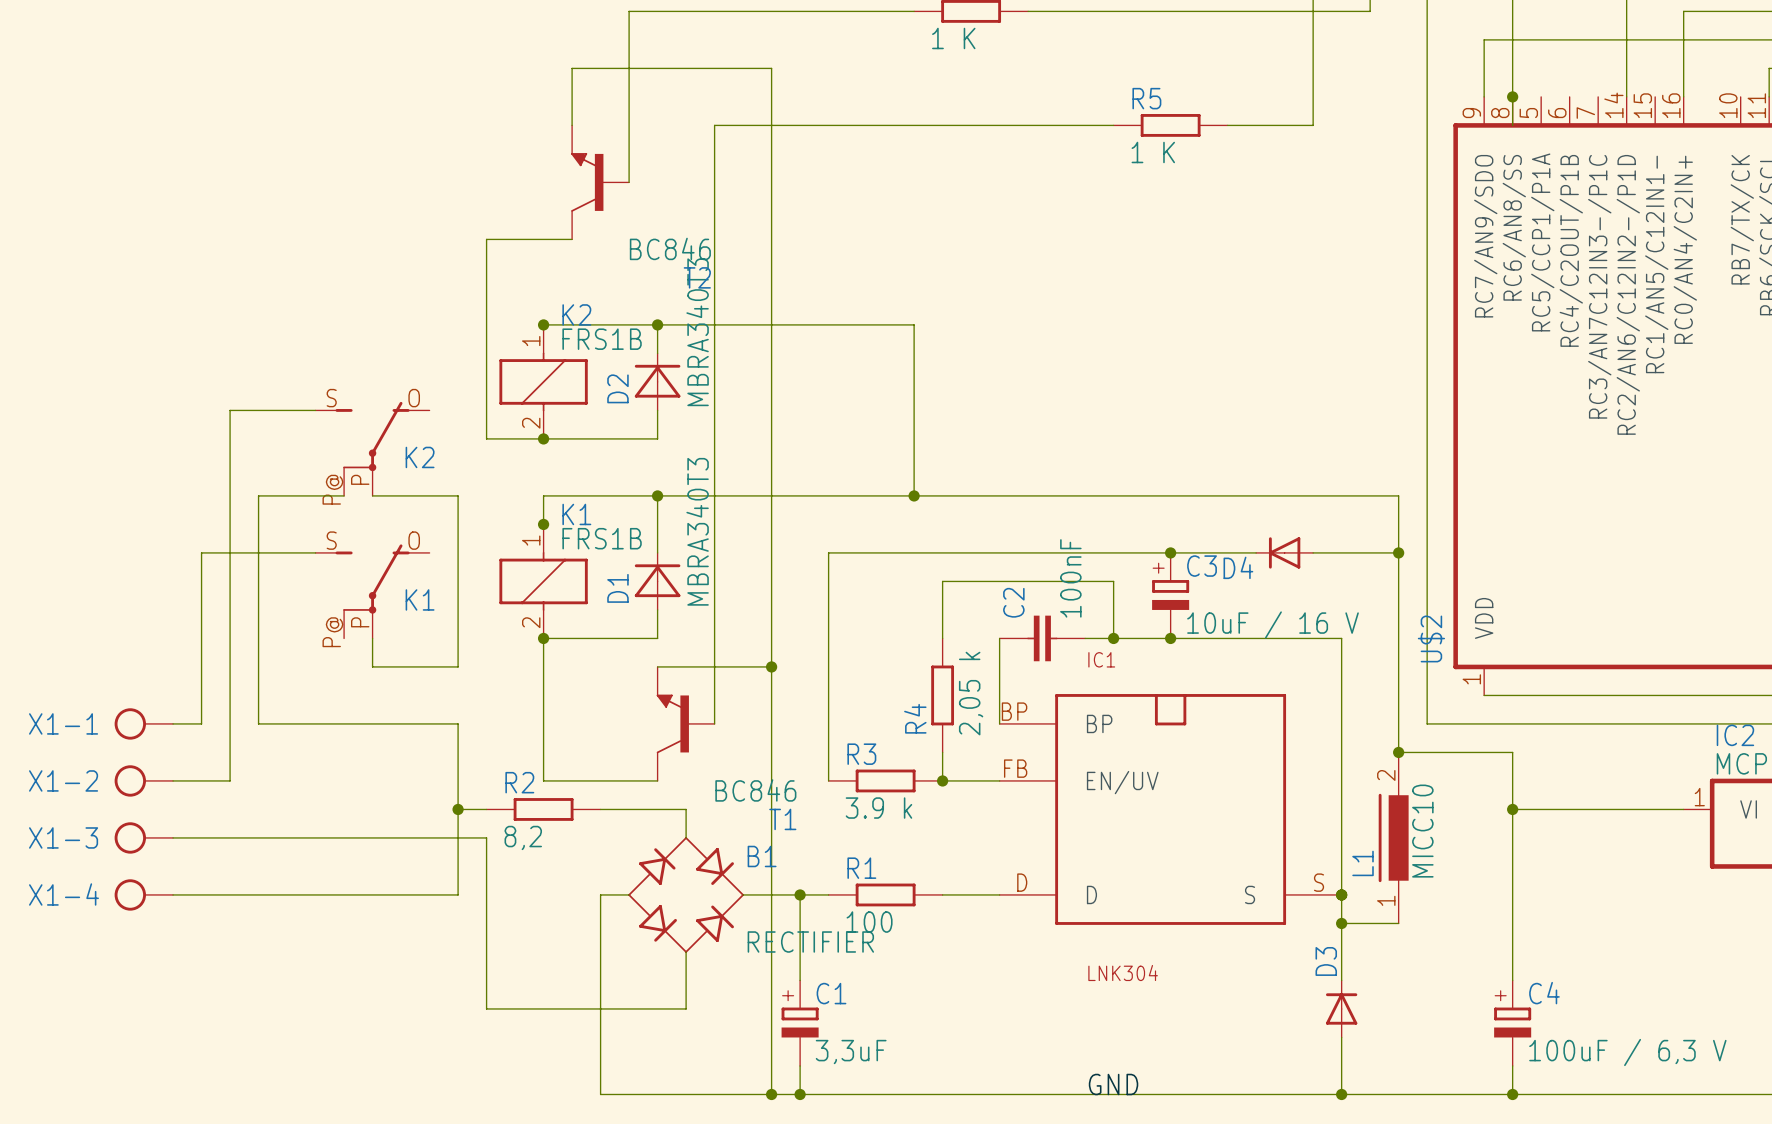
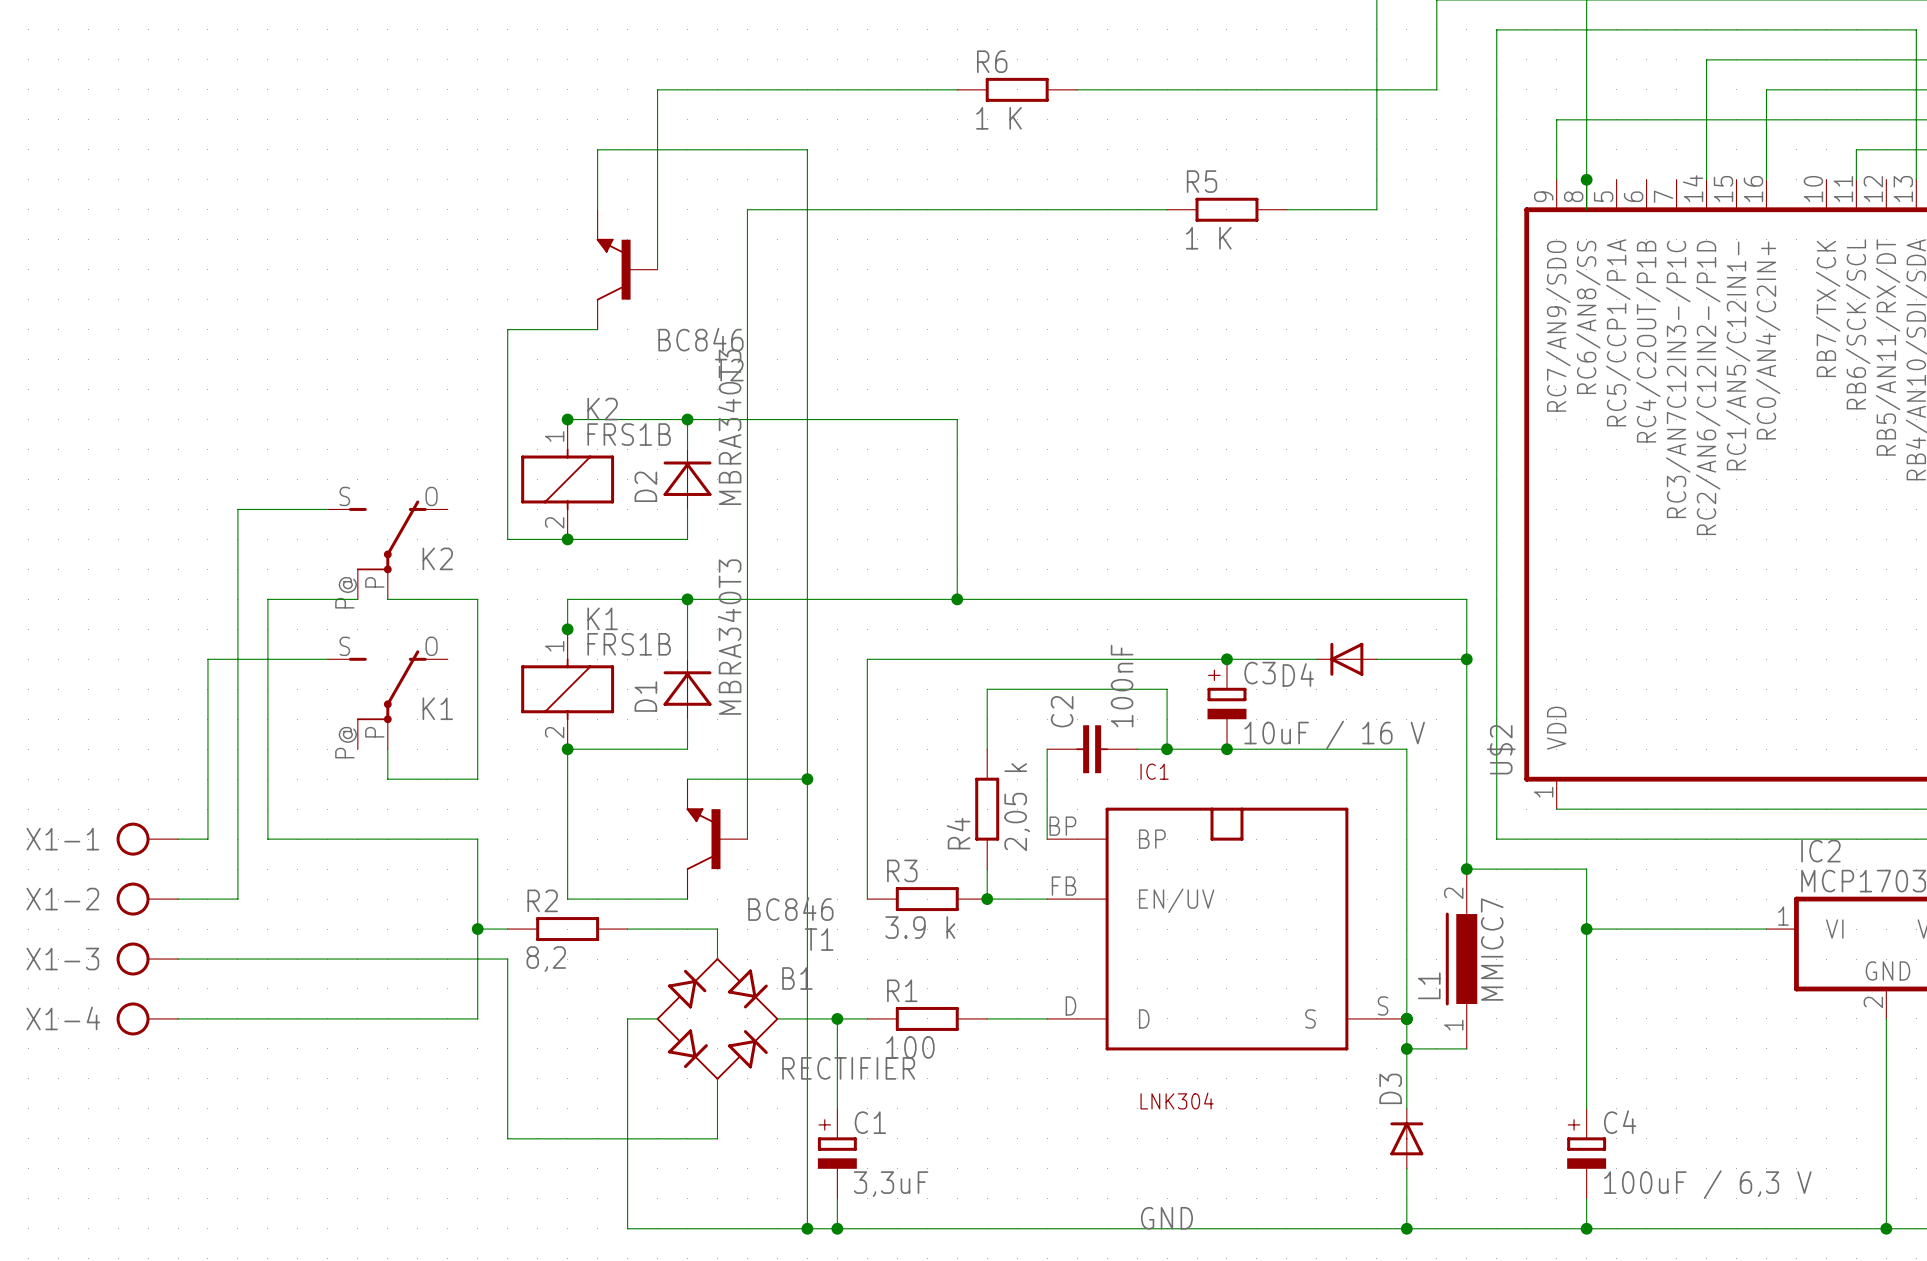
L1 value: MICC10 (1422, 831) -> MMICC7 (1492, 949)

